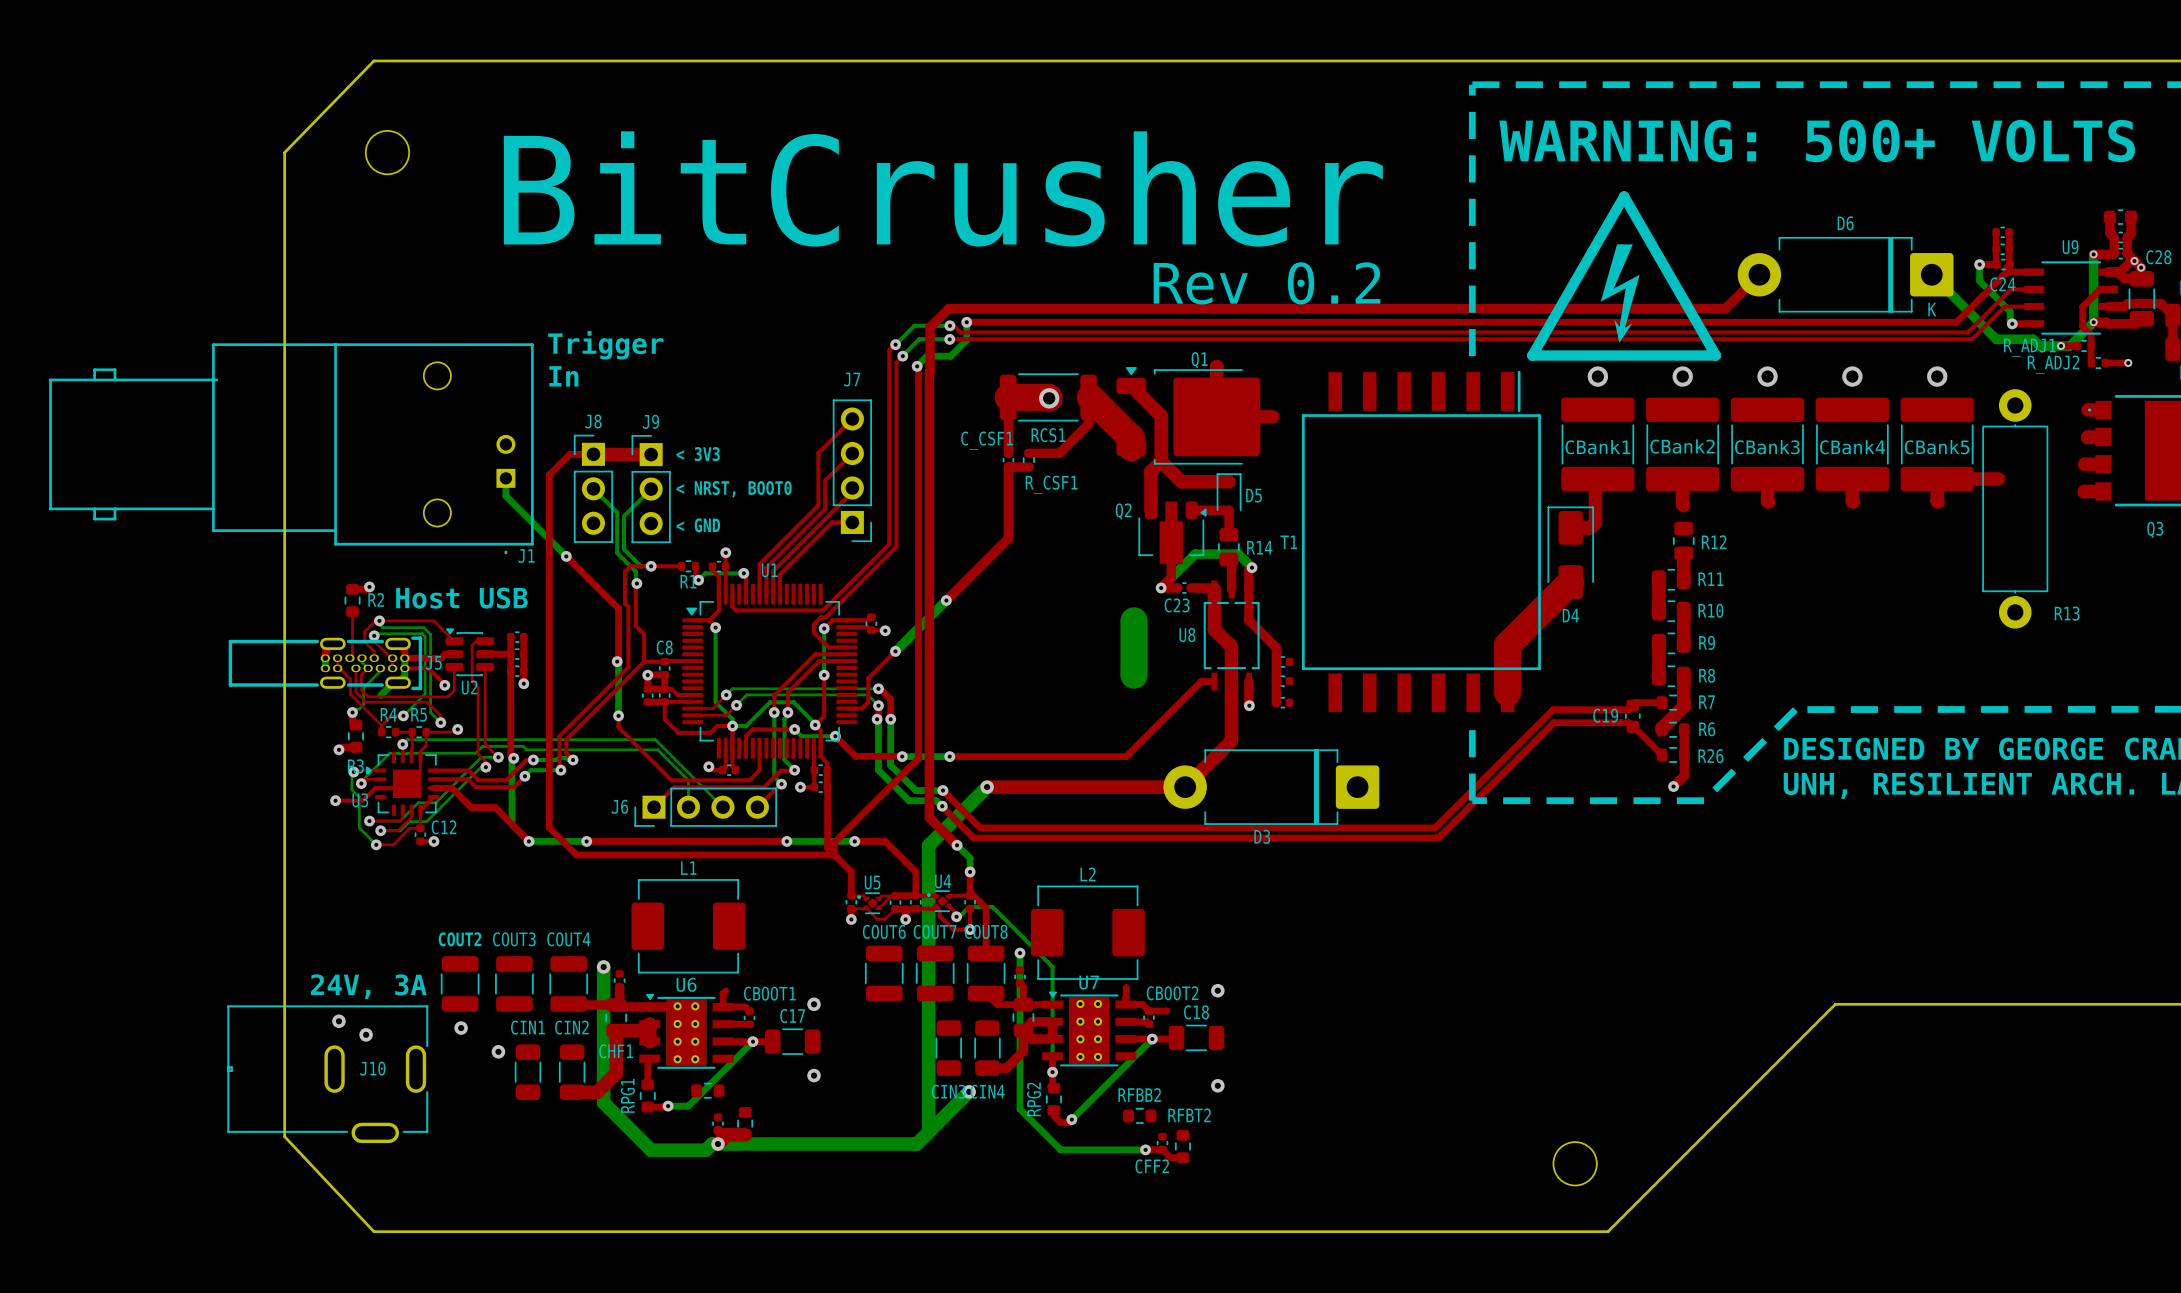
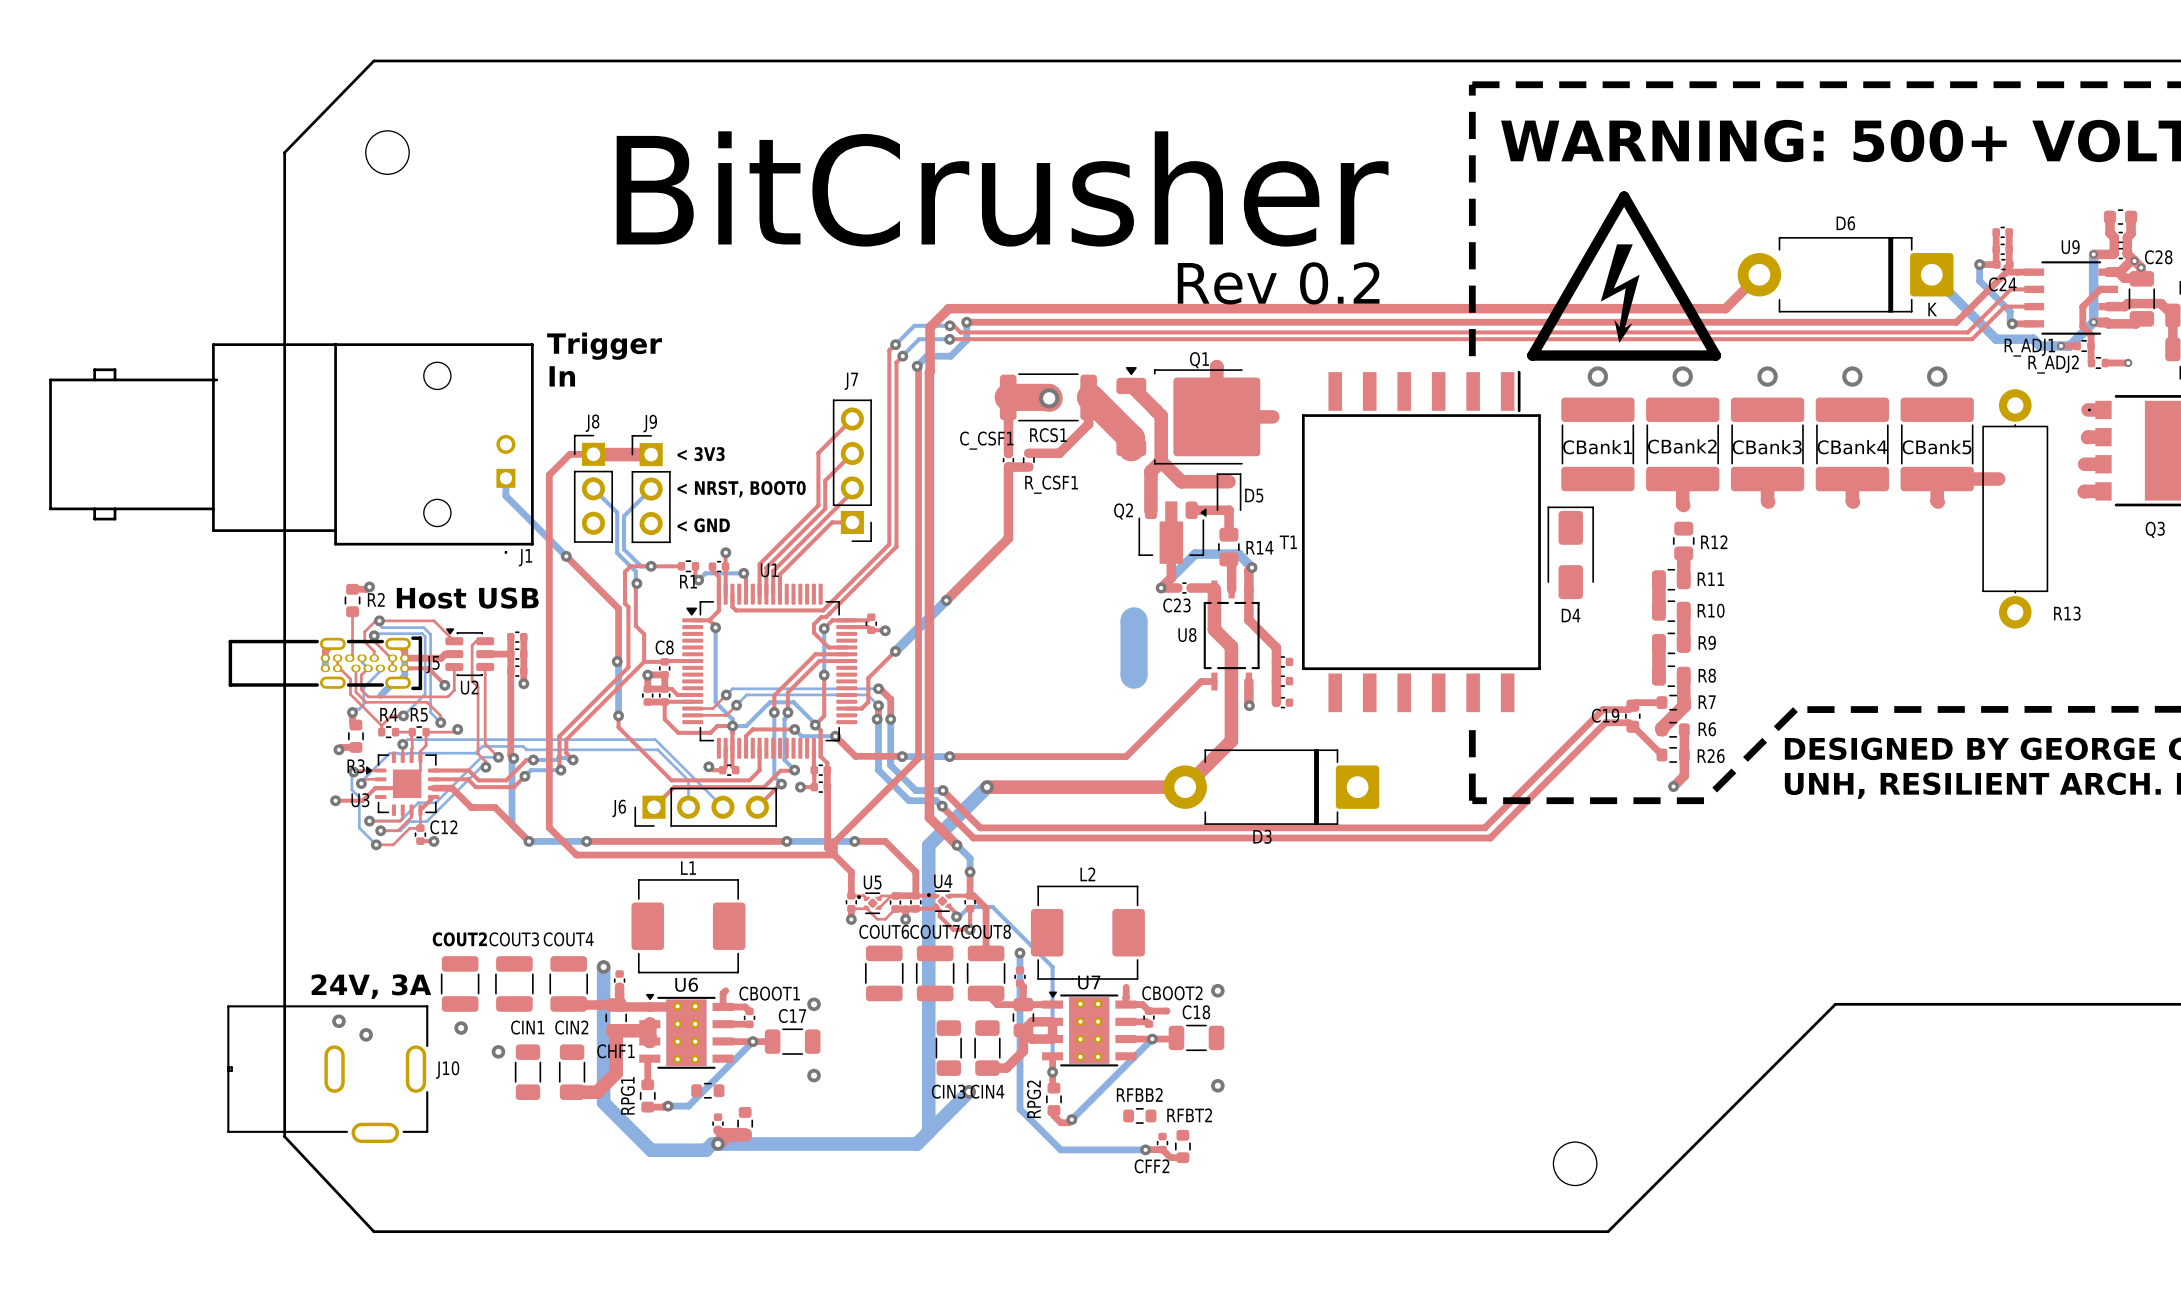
top track: (1595, 481) (1595, 522) (1590, 527) (1570, 527) -> none
top track: (1570, 582) (1507, 645) (1507, 692) -> none
top track: (1602, 709) (1553, 709) (1435, 827) -> (1602, 709) (1484, 827) (1435, 827)
top track: (1605, 722) (1553, 722) (1439, 837) (1436, 838) -> (1605, 722) (1490, 838) (1436, 838)
J10 name position: J10 (372, 1068) -> J10 (447, 1070)

